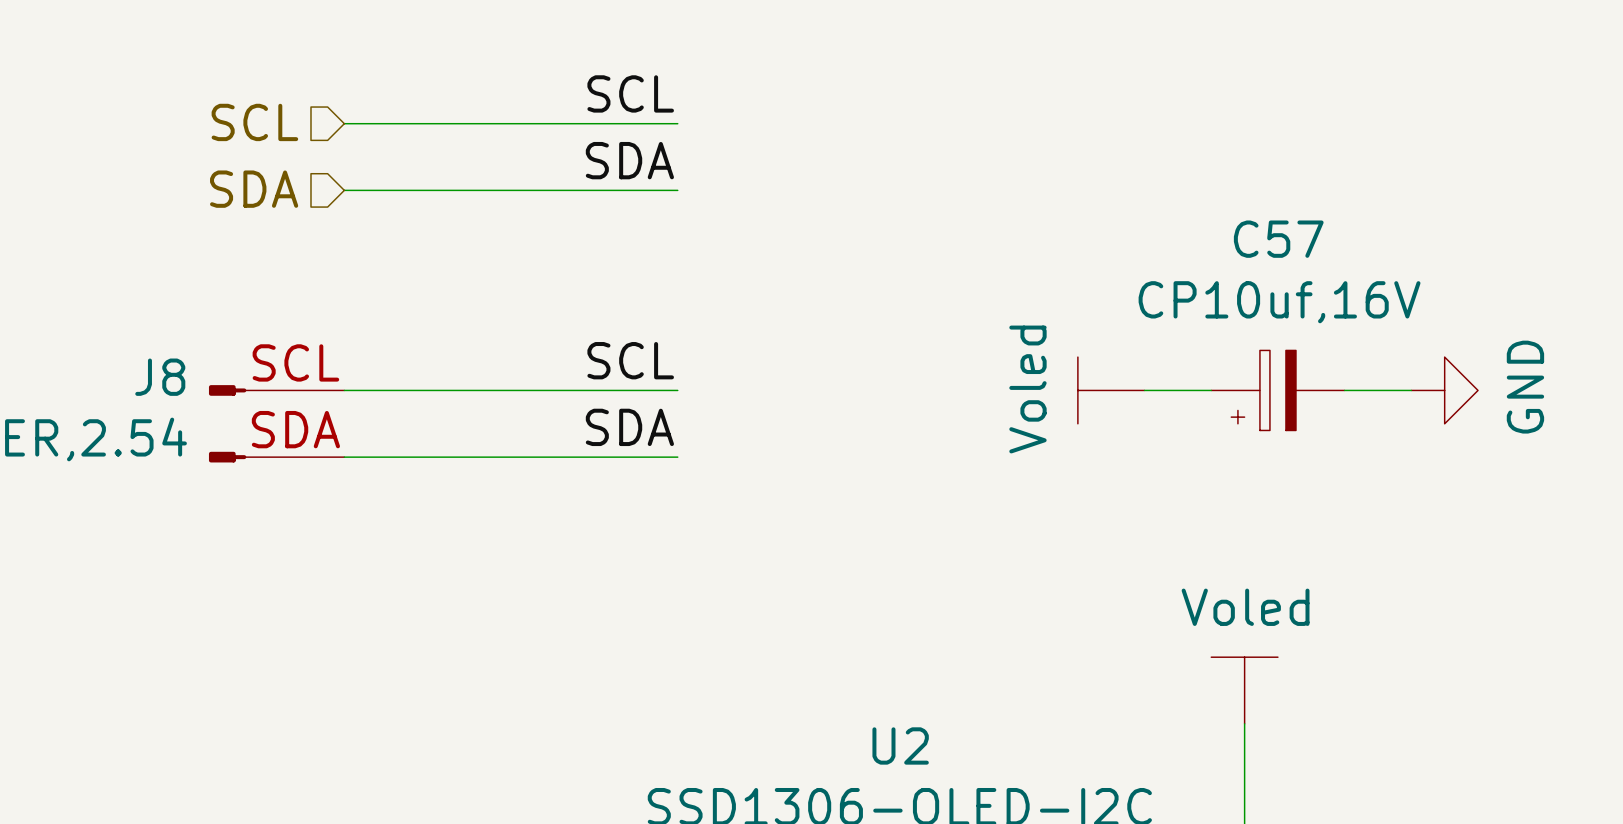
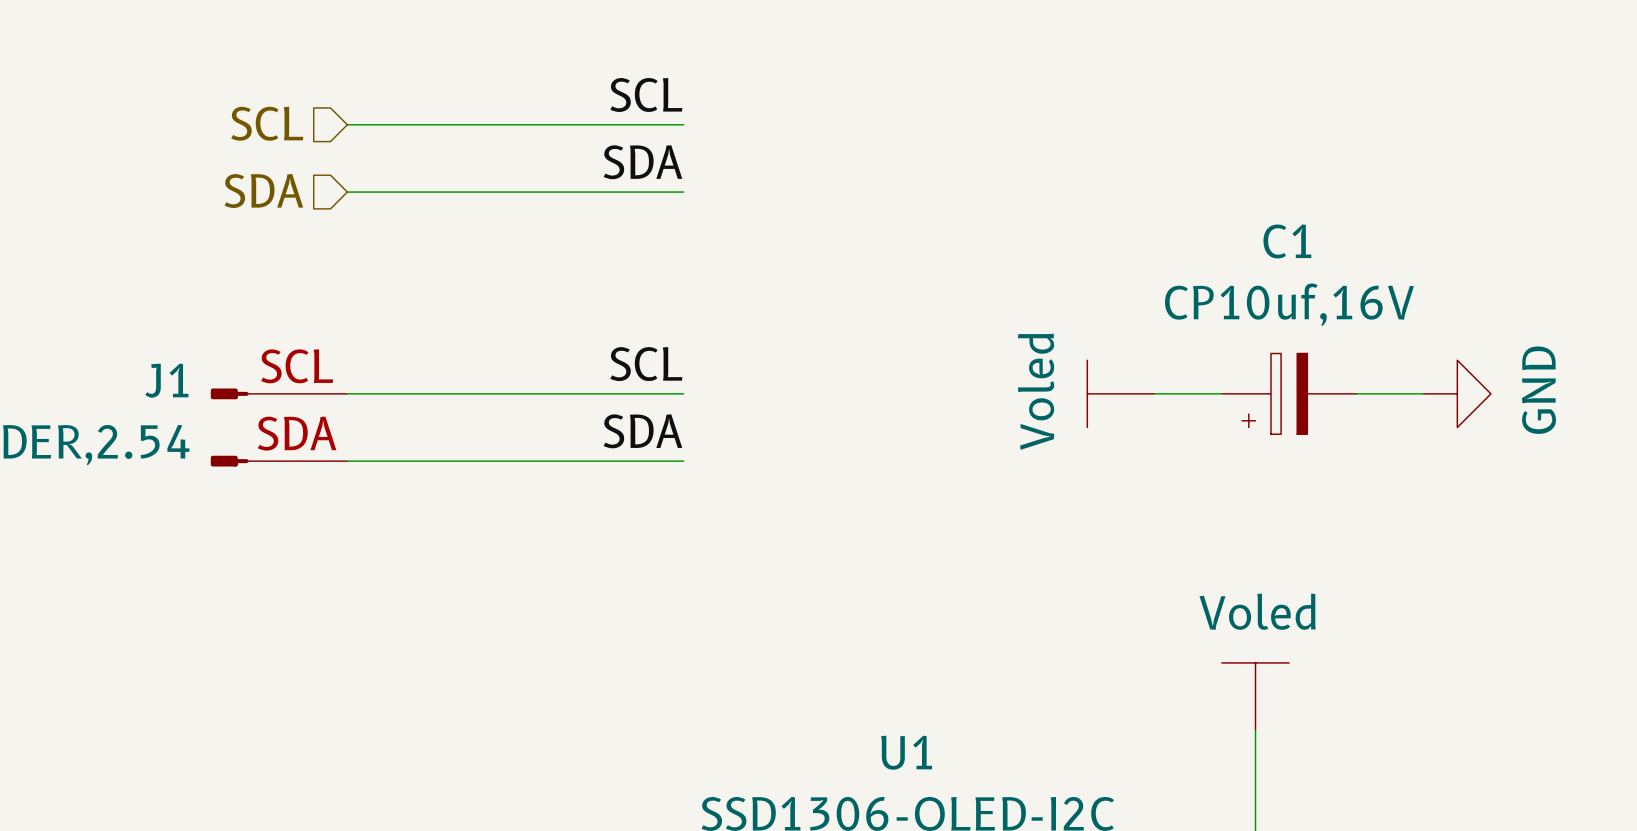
C57 name: C57 (1278, 239) -> C1 (1287, 241)
J8 name: J8 (160, 377) -> J1 (166, 380)
U2 name: U2 (900, 745) -> U1 (906, 752)

